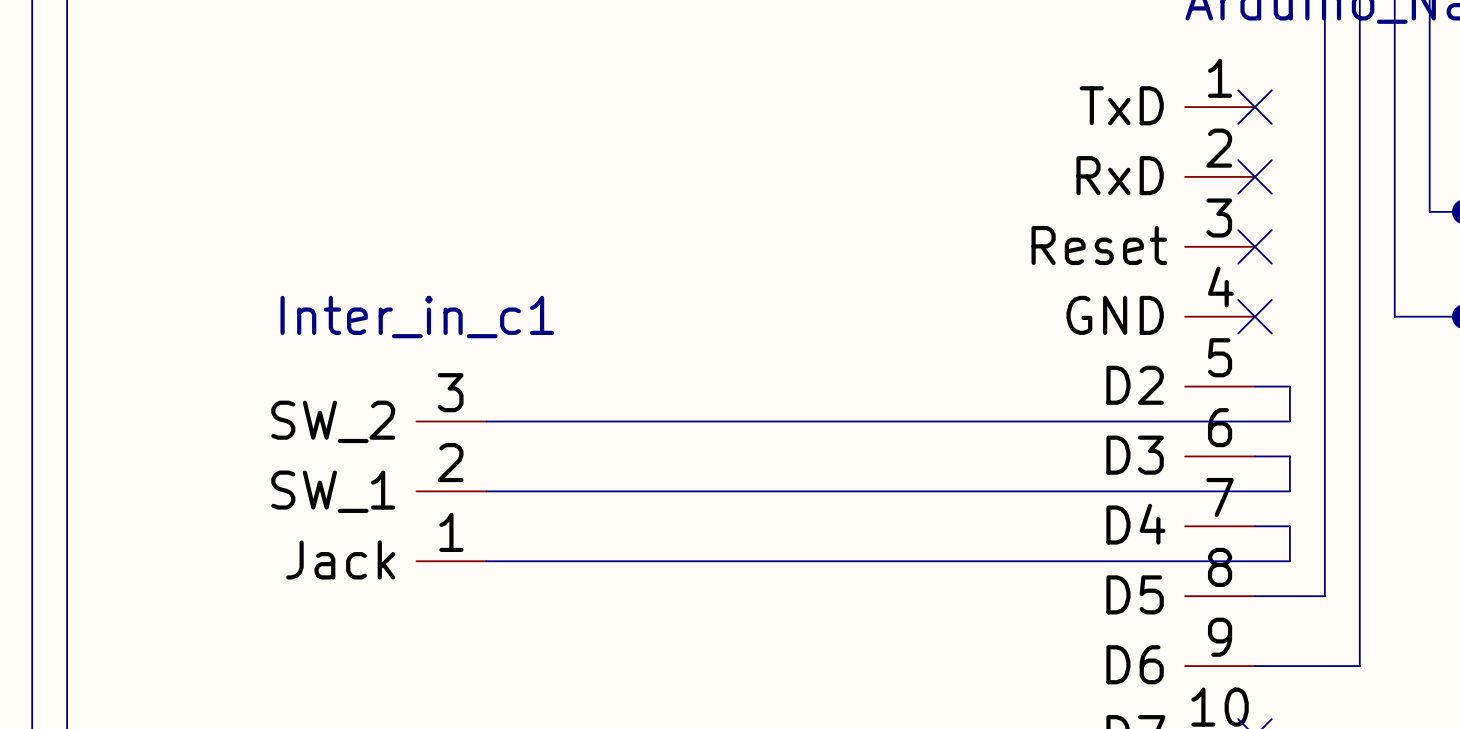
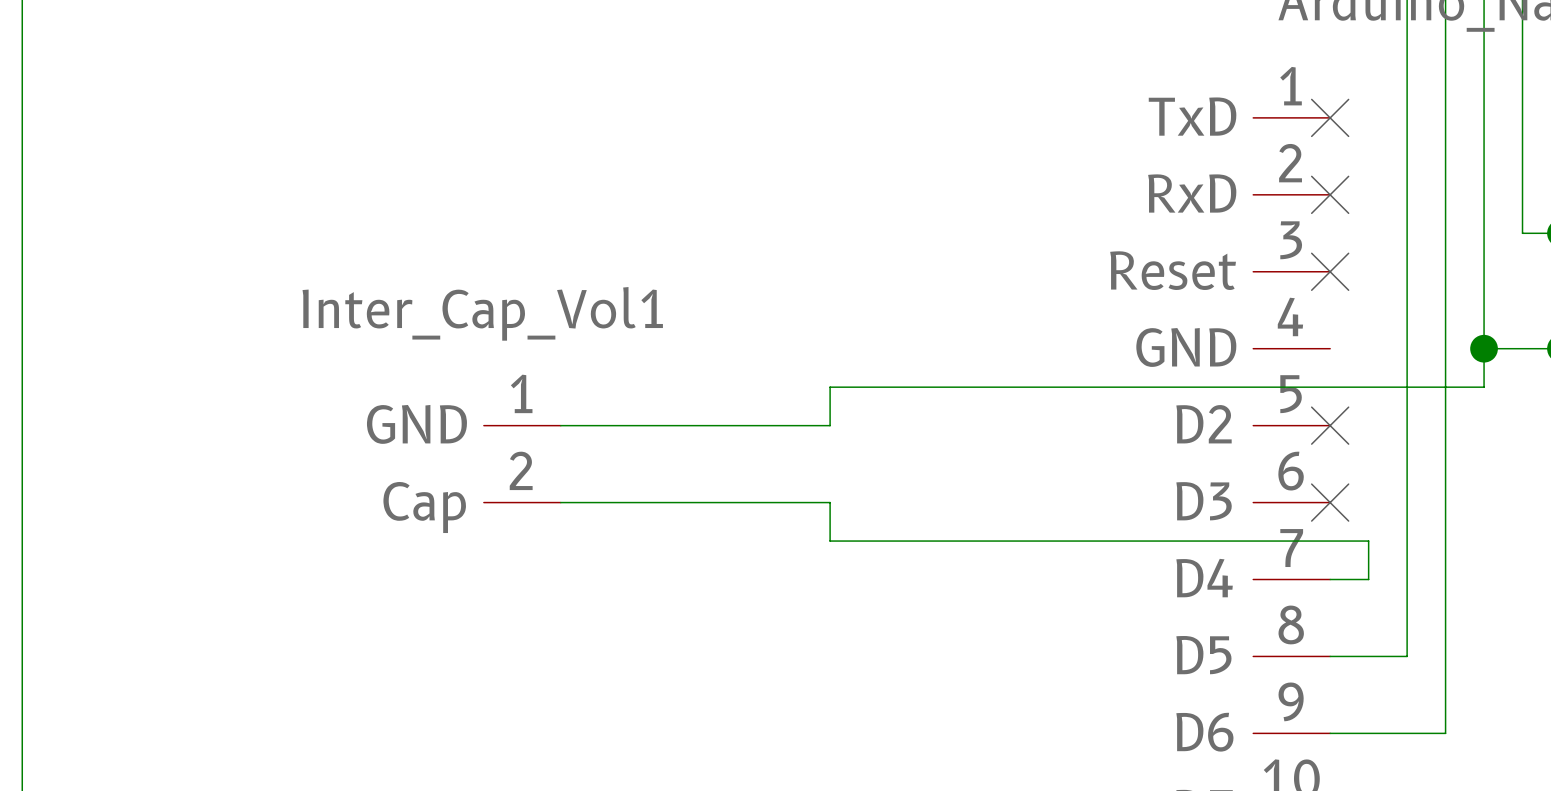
no-connect mark: (1254, 316) -> none
wire: none -> (1484, 348) (1484, 387) (830, 387) (830, 425) (560, 425)
junction: none -> (1484, 348)
wire: (1254, 386) (1289, 386) (1289, 421) (486, 421) -> none
no-connect mark: none -> (1330, 425)
Inter_Cap_Vol1: none -> (522, 464)
wire: (1254, 456) (1289, 456) (1289, 491) -> (1368, 579) (1368, 541)
no-connect mark: none -> (1330, 502)
Inter_in_c1: (451, 491) -> none
wire: (486, 491) (800, 491) -> (560, 502) (830, 502) (830, 541)
wire: (1289, 526) (1289, 561) (486, 561) -> none

